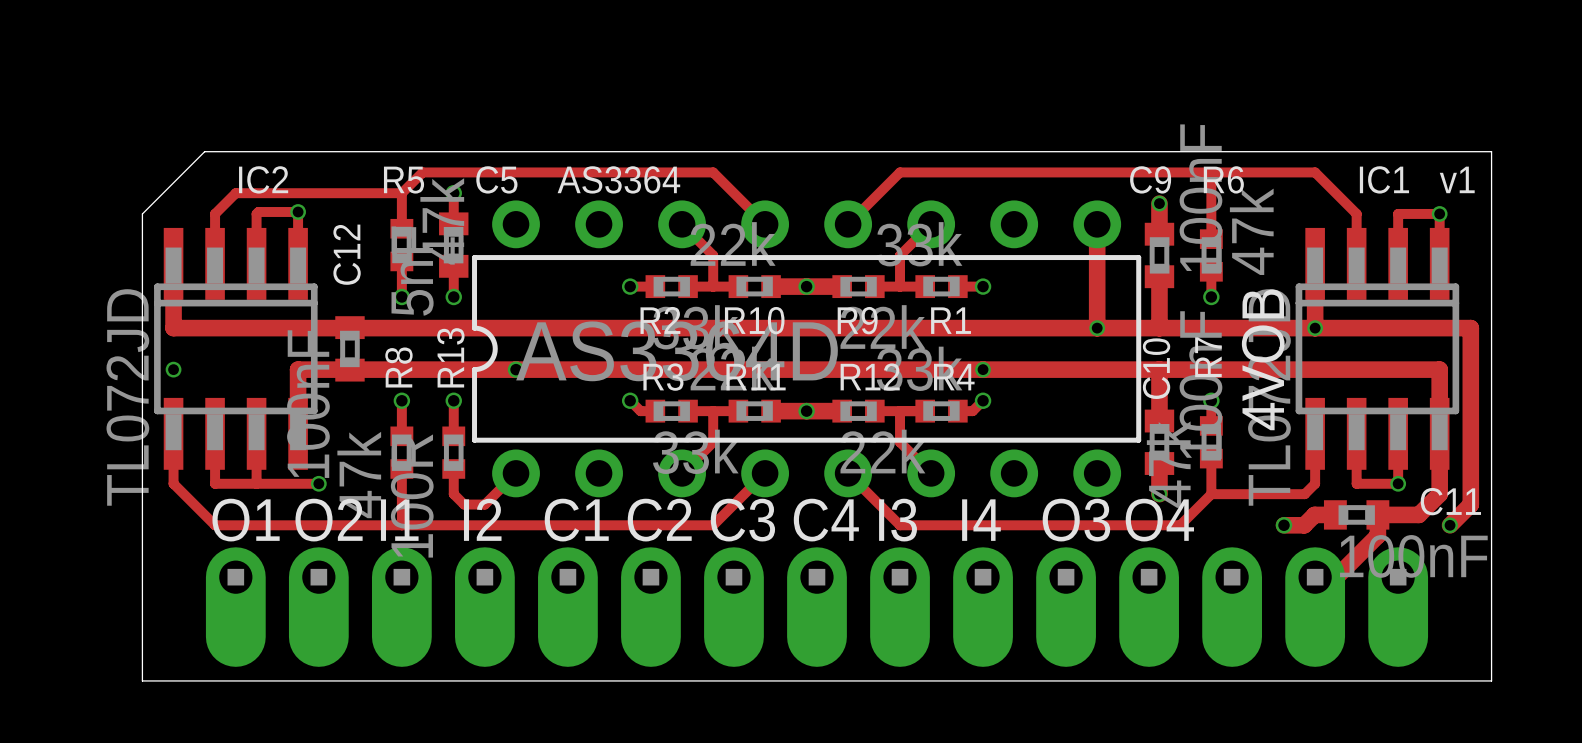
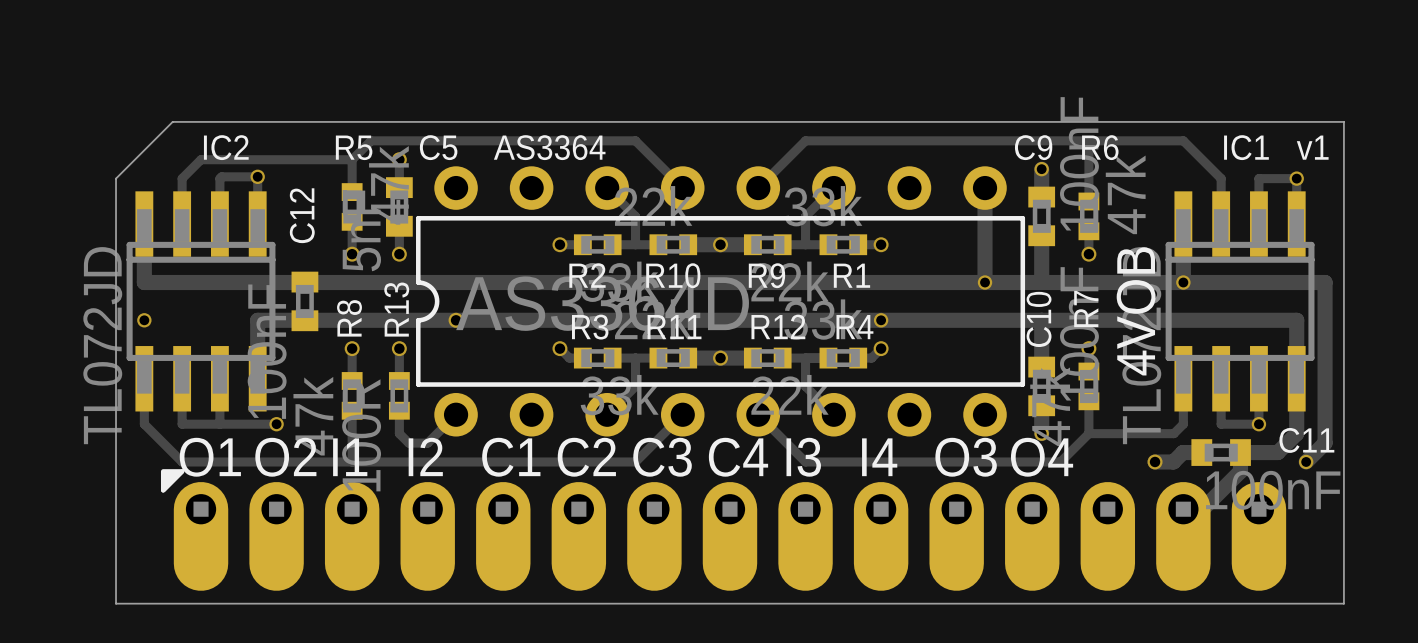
part footprint: [787, 547, 847, 667] -> [160, 469, 1287, 591]

